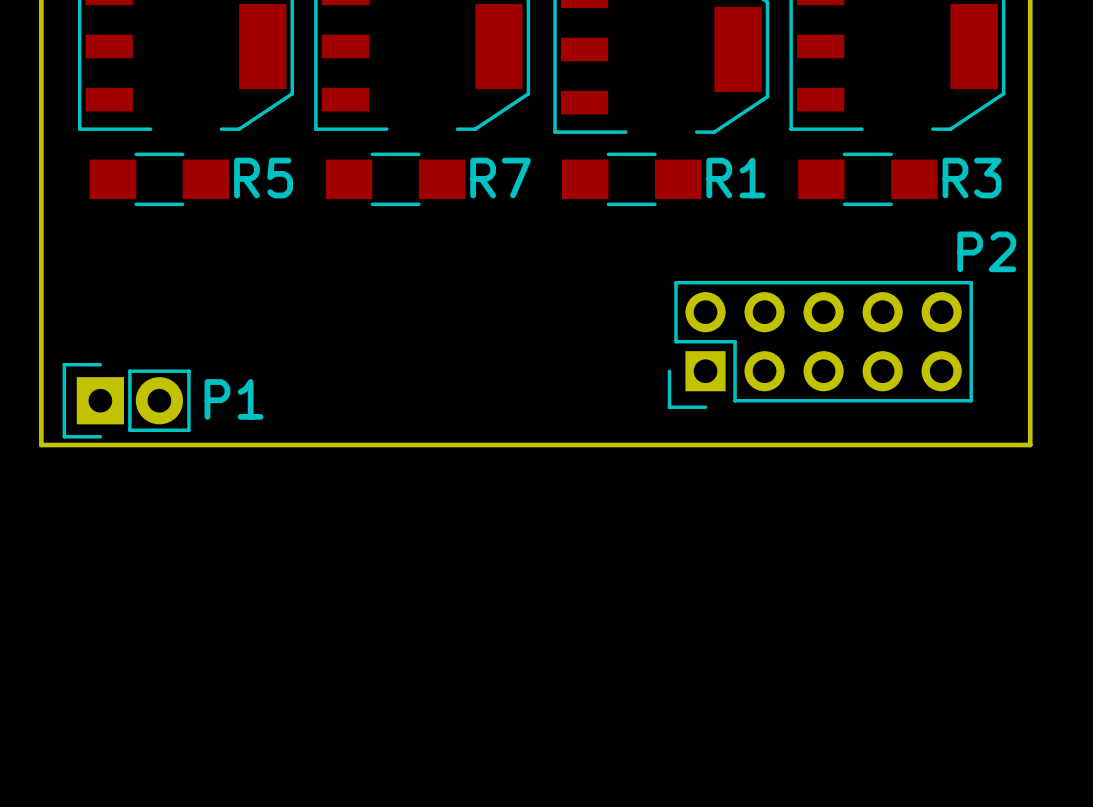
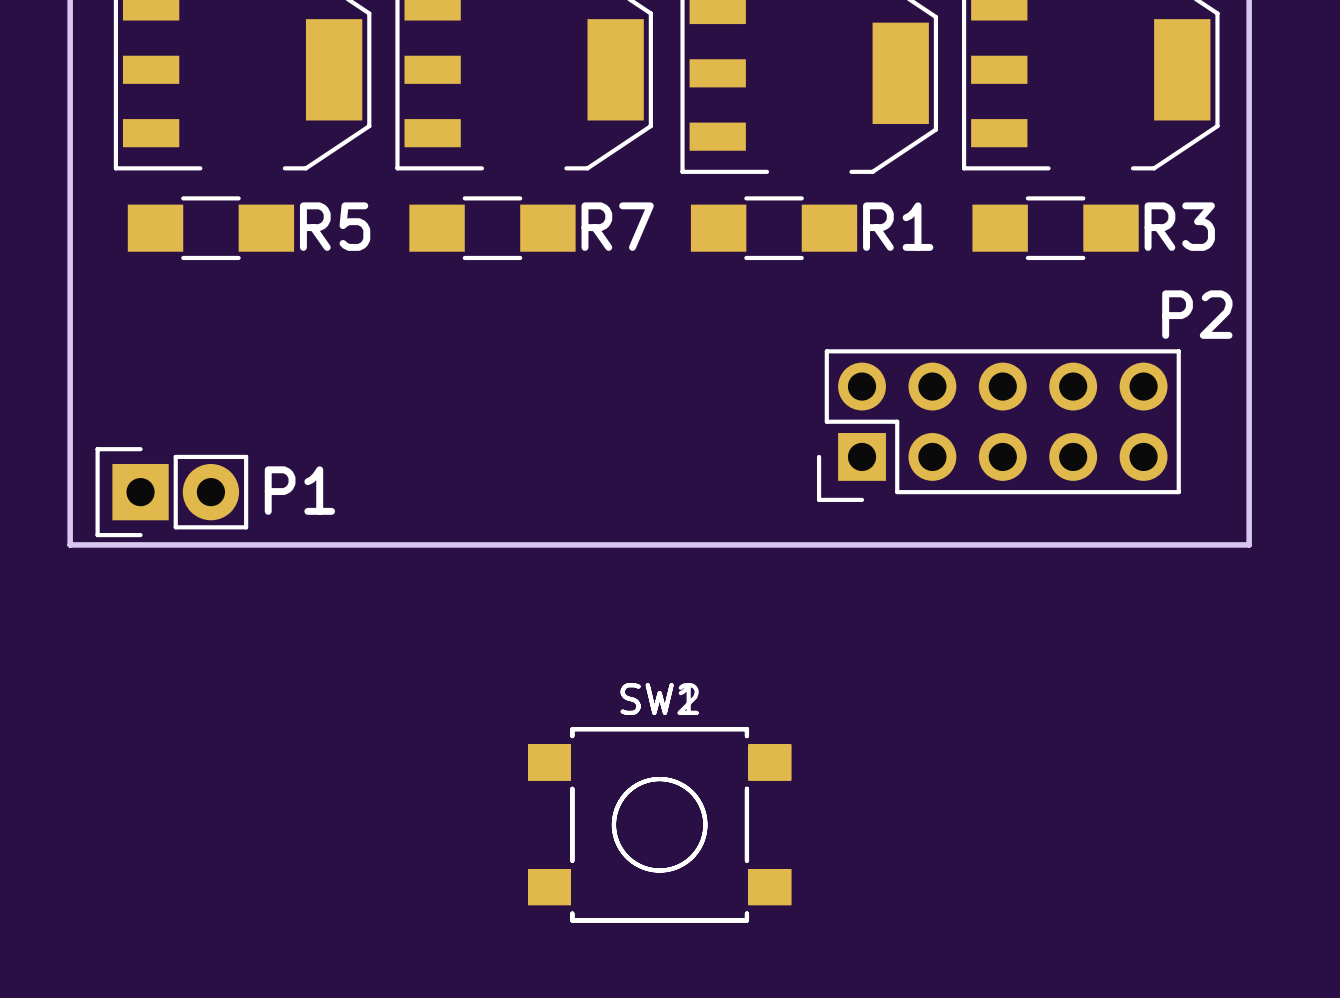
part: none -> (659, 824)
part: none -> (659, 824)

